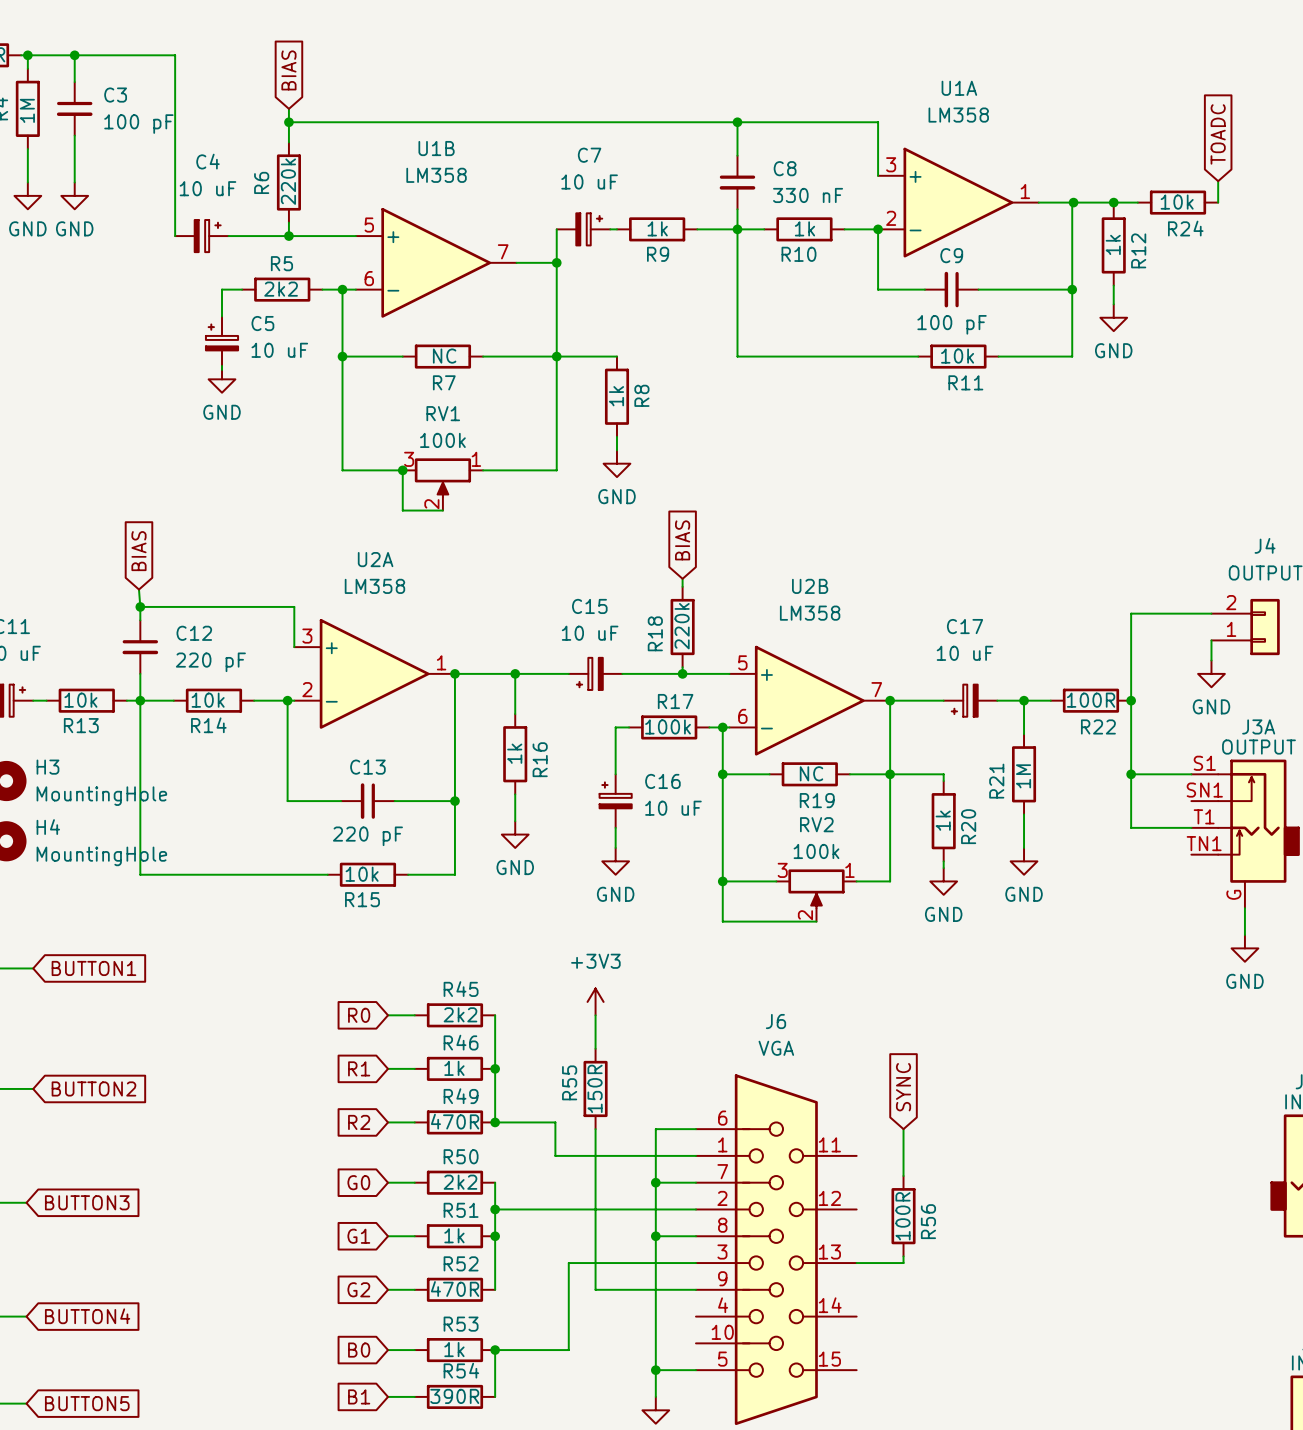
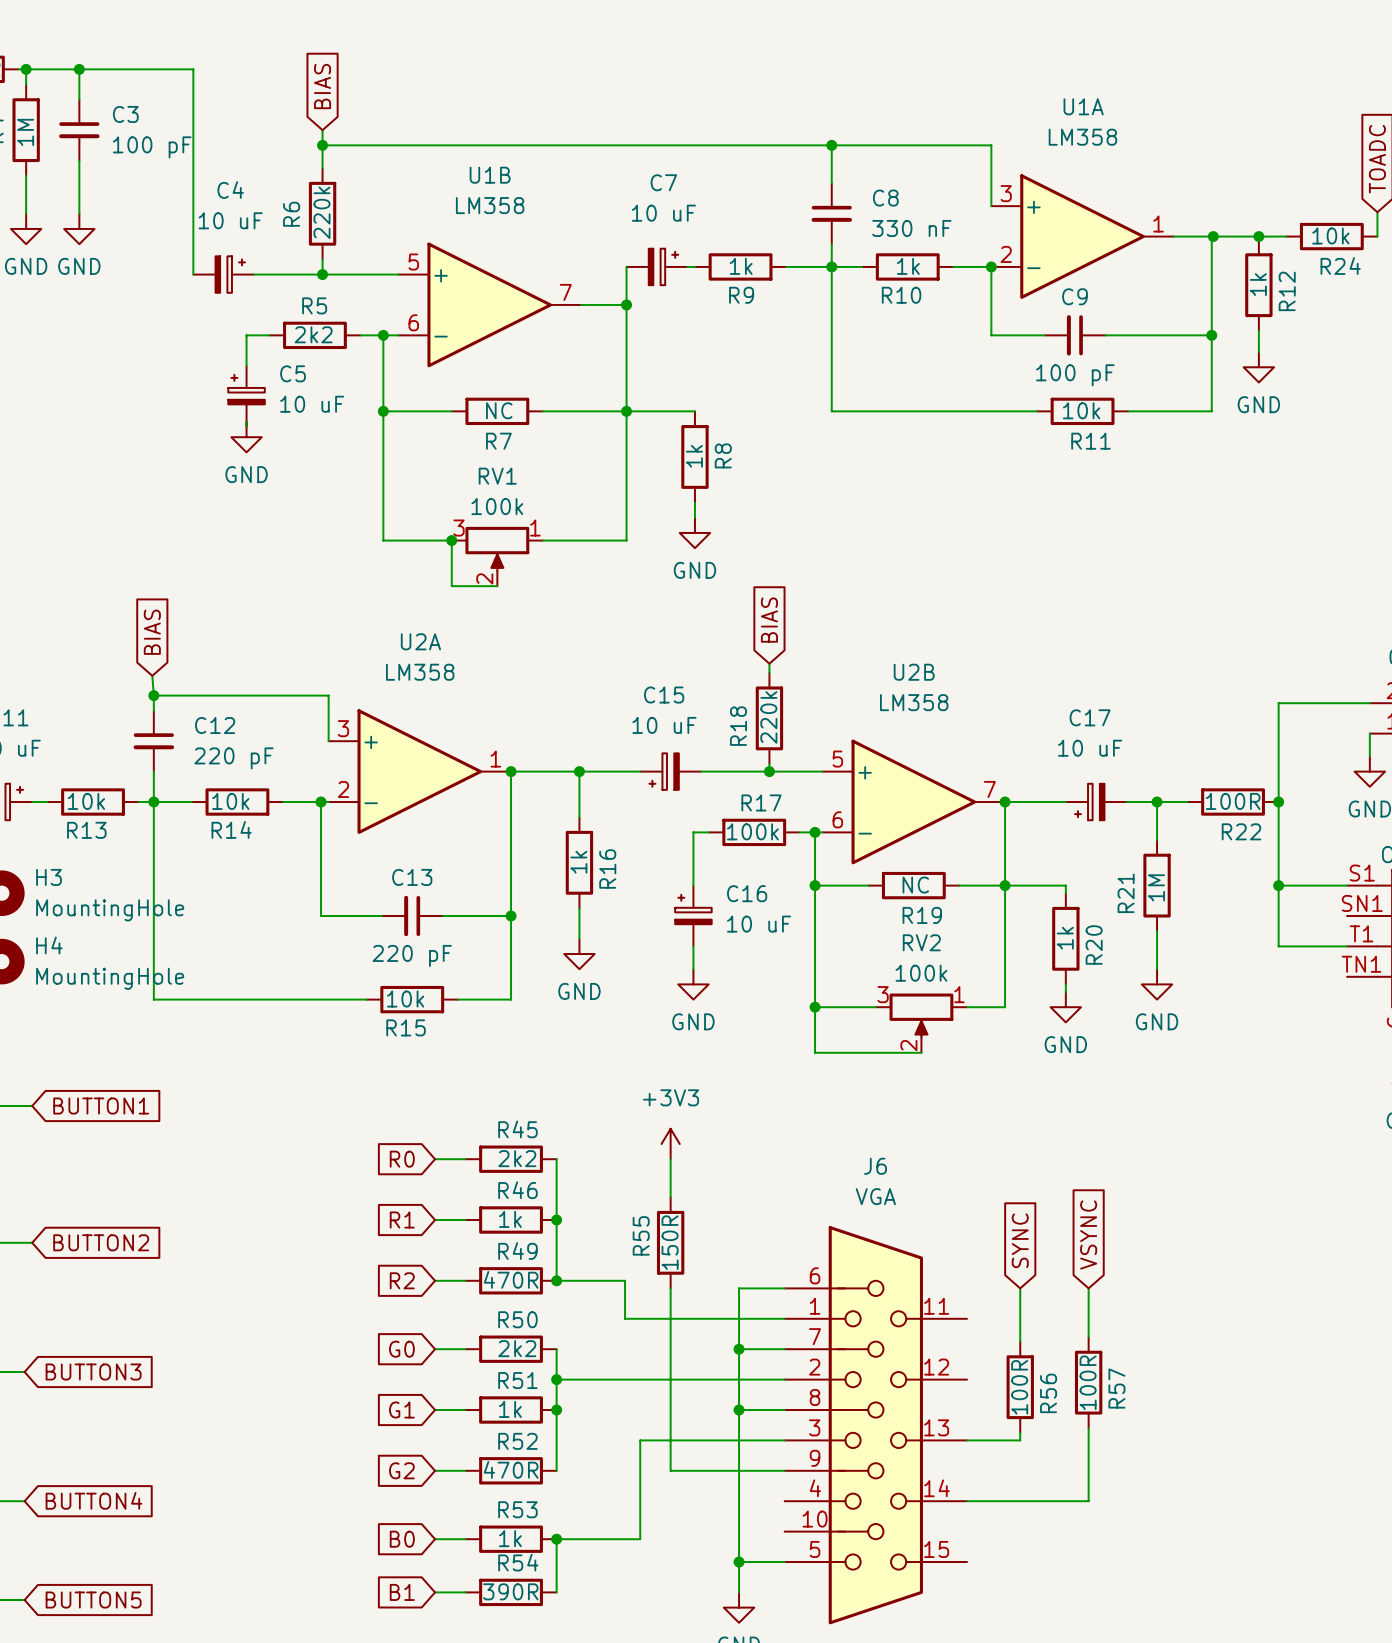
global label: none -> VSYNC (1088, 1235)
wire: none -> (1088, 1288) (1088, 1337)
R57: none -> 100R (1088, 1382)
wire: none -> (1088, 1428) (1088, 1501) (967, 1501)

